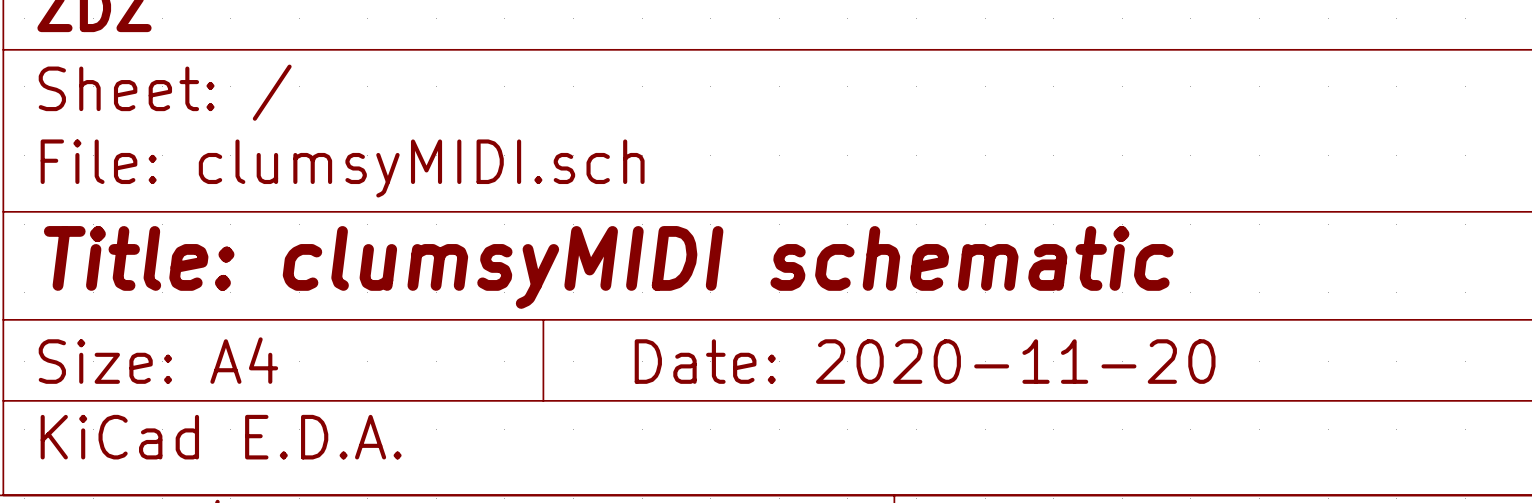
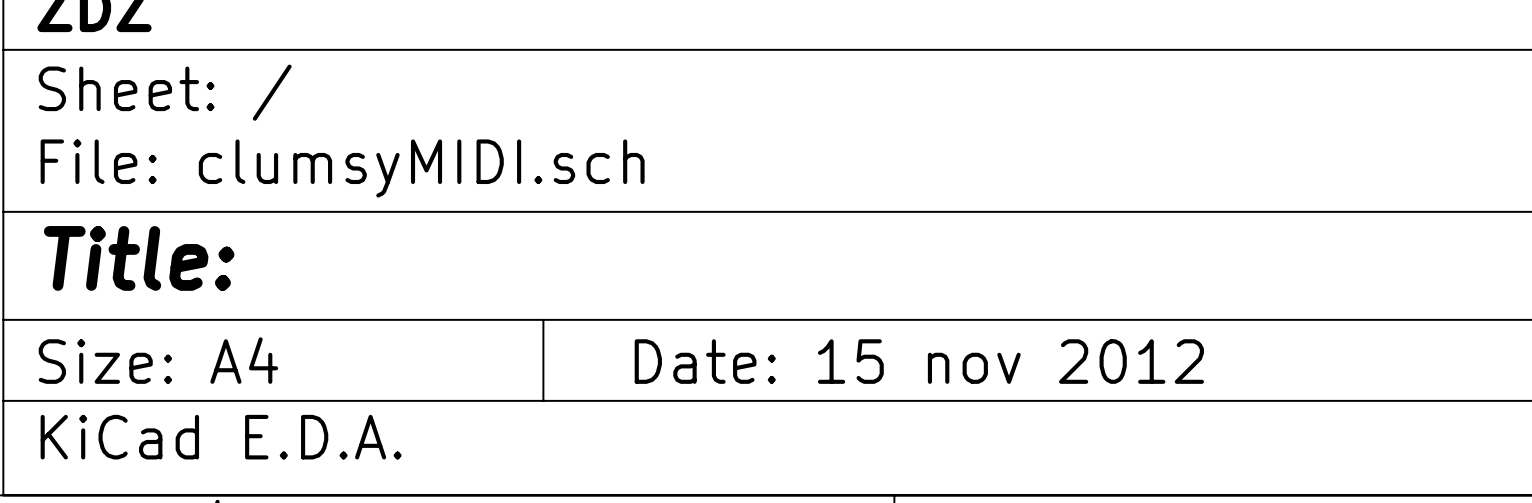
title block: Title: clumsyMIDI schematic (608, 267) -> Title: (139, 258)
title block: Date: 2020-11-20 (925, 361) -> Date: 15 nov 2012 (919, 361)

